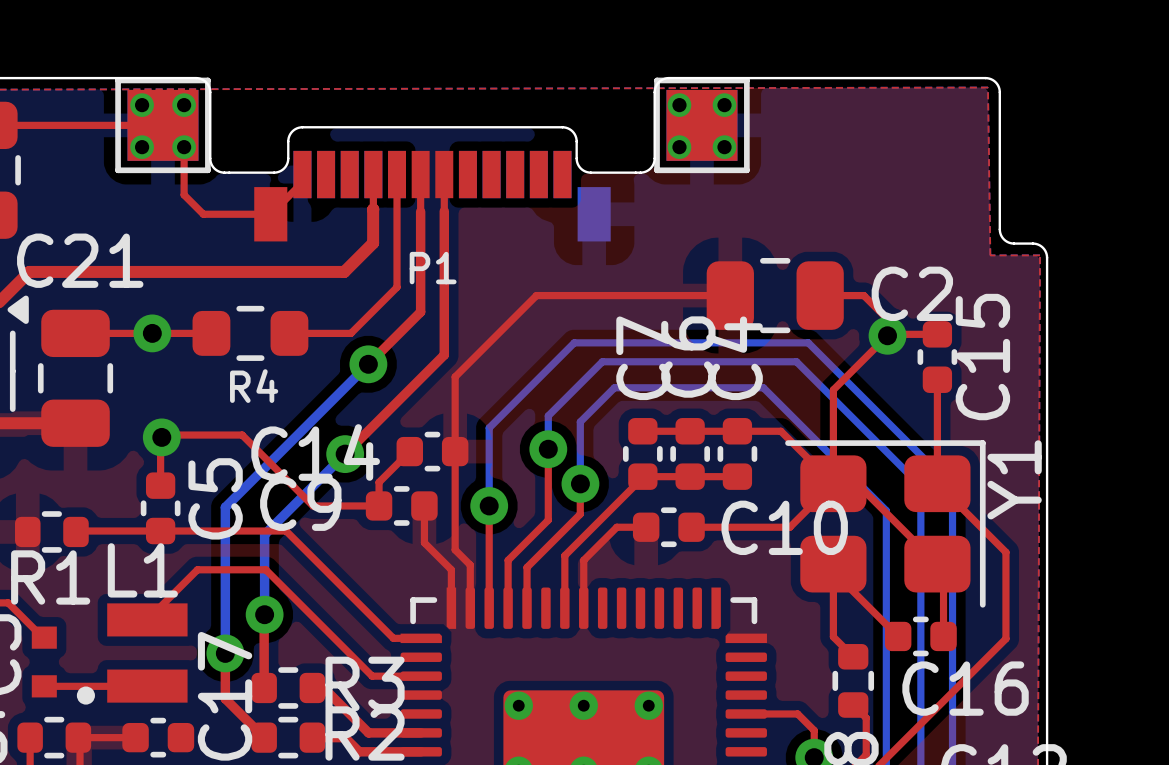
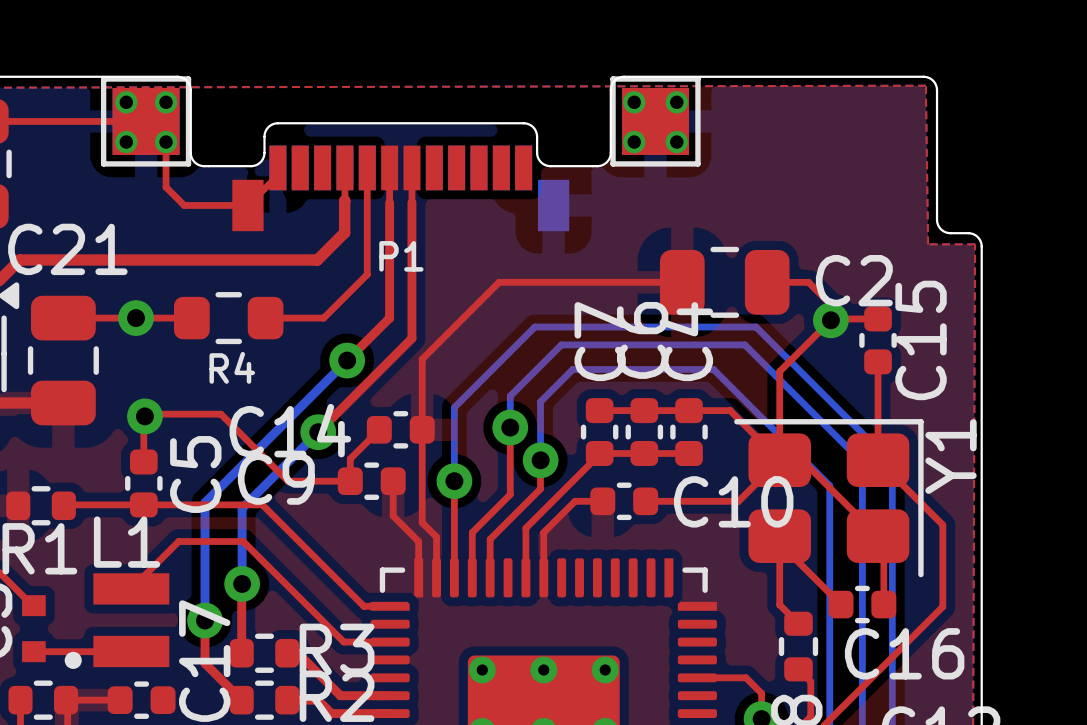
top track: (420, 312) (368, 364) -> (389, 297) (389, 318) (347, 360)
bottom track: (368, 364) (225, 507) (225, 528) -> (347, 360) (205, 502)
via position: (368, 364) -> (347, 360)

